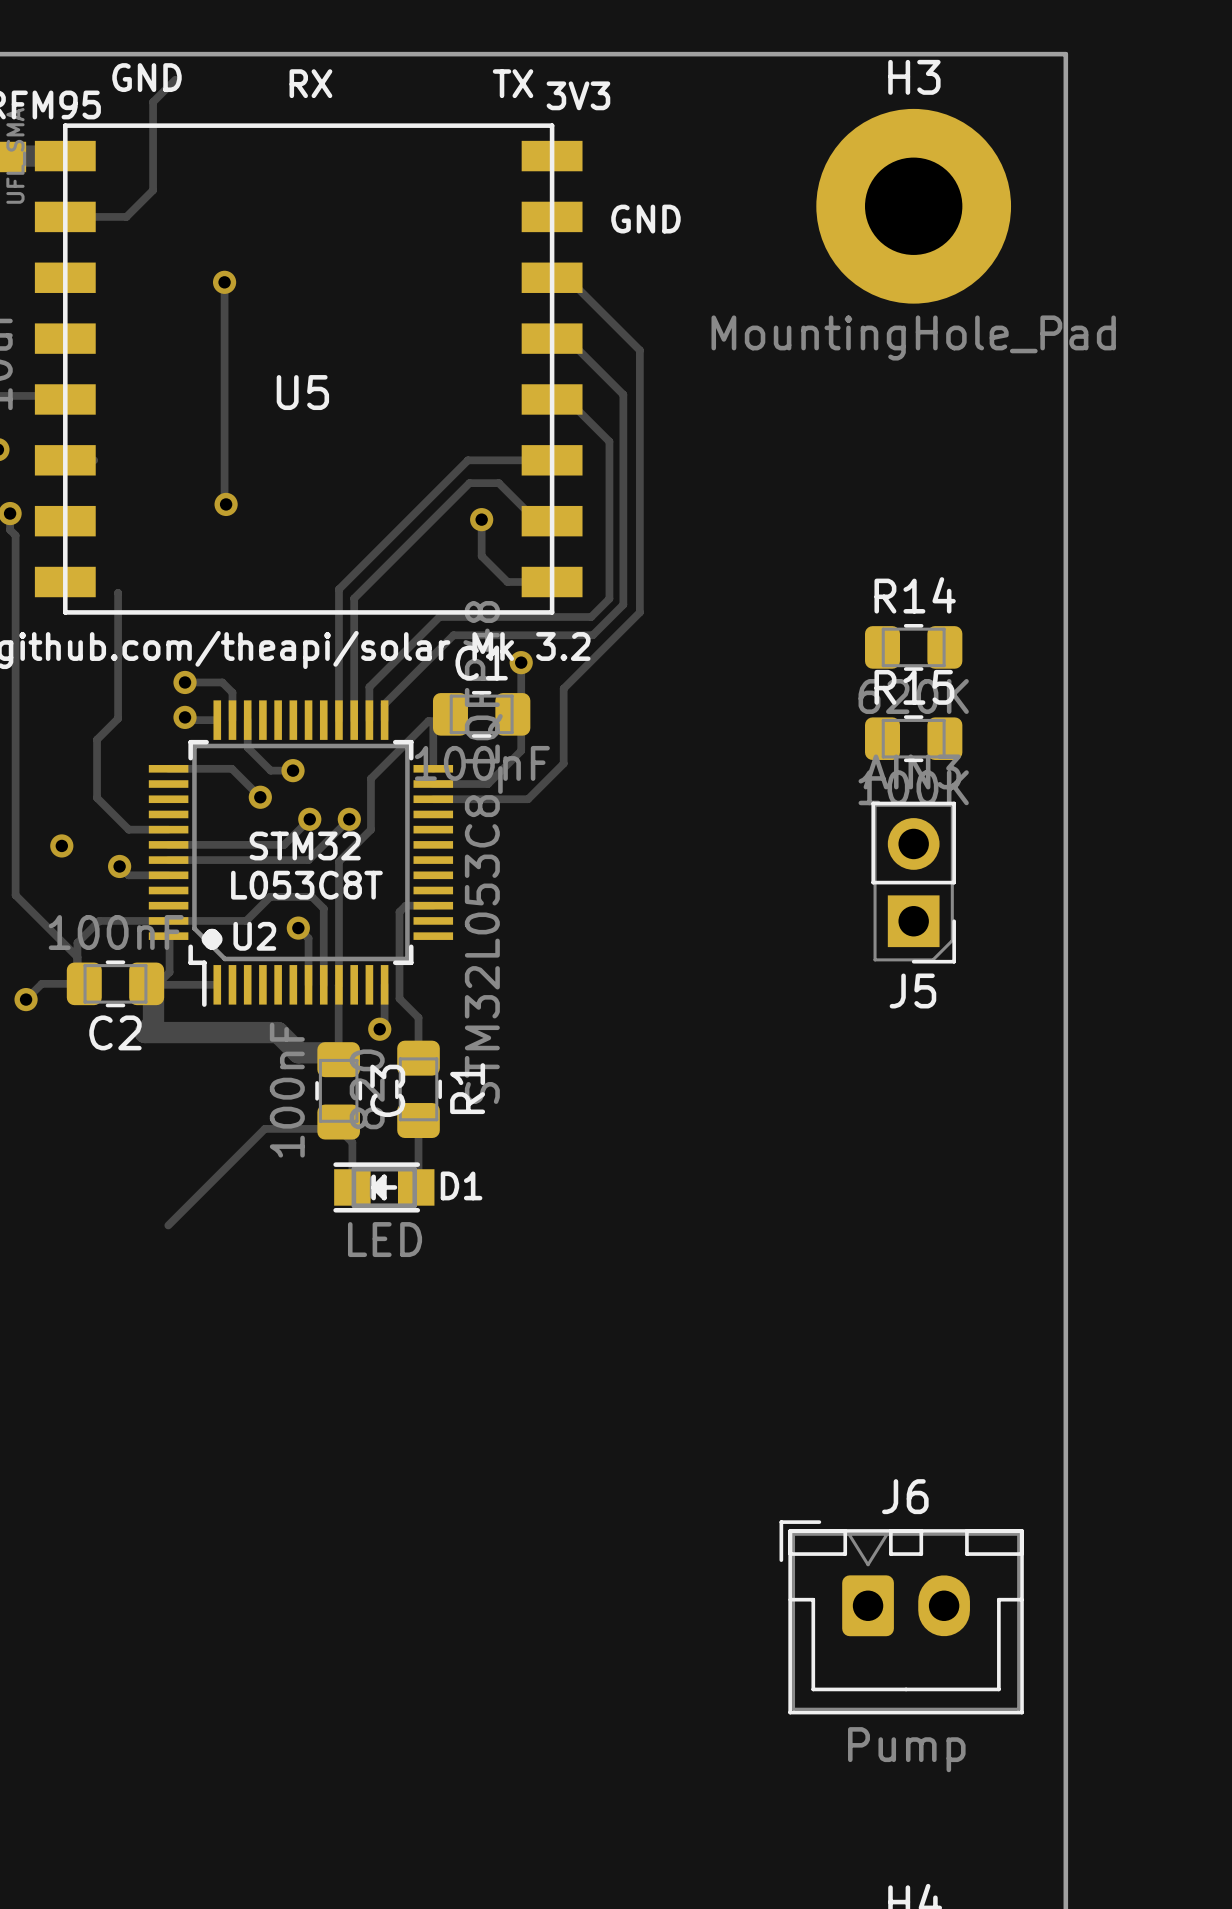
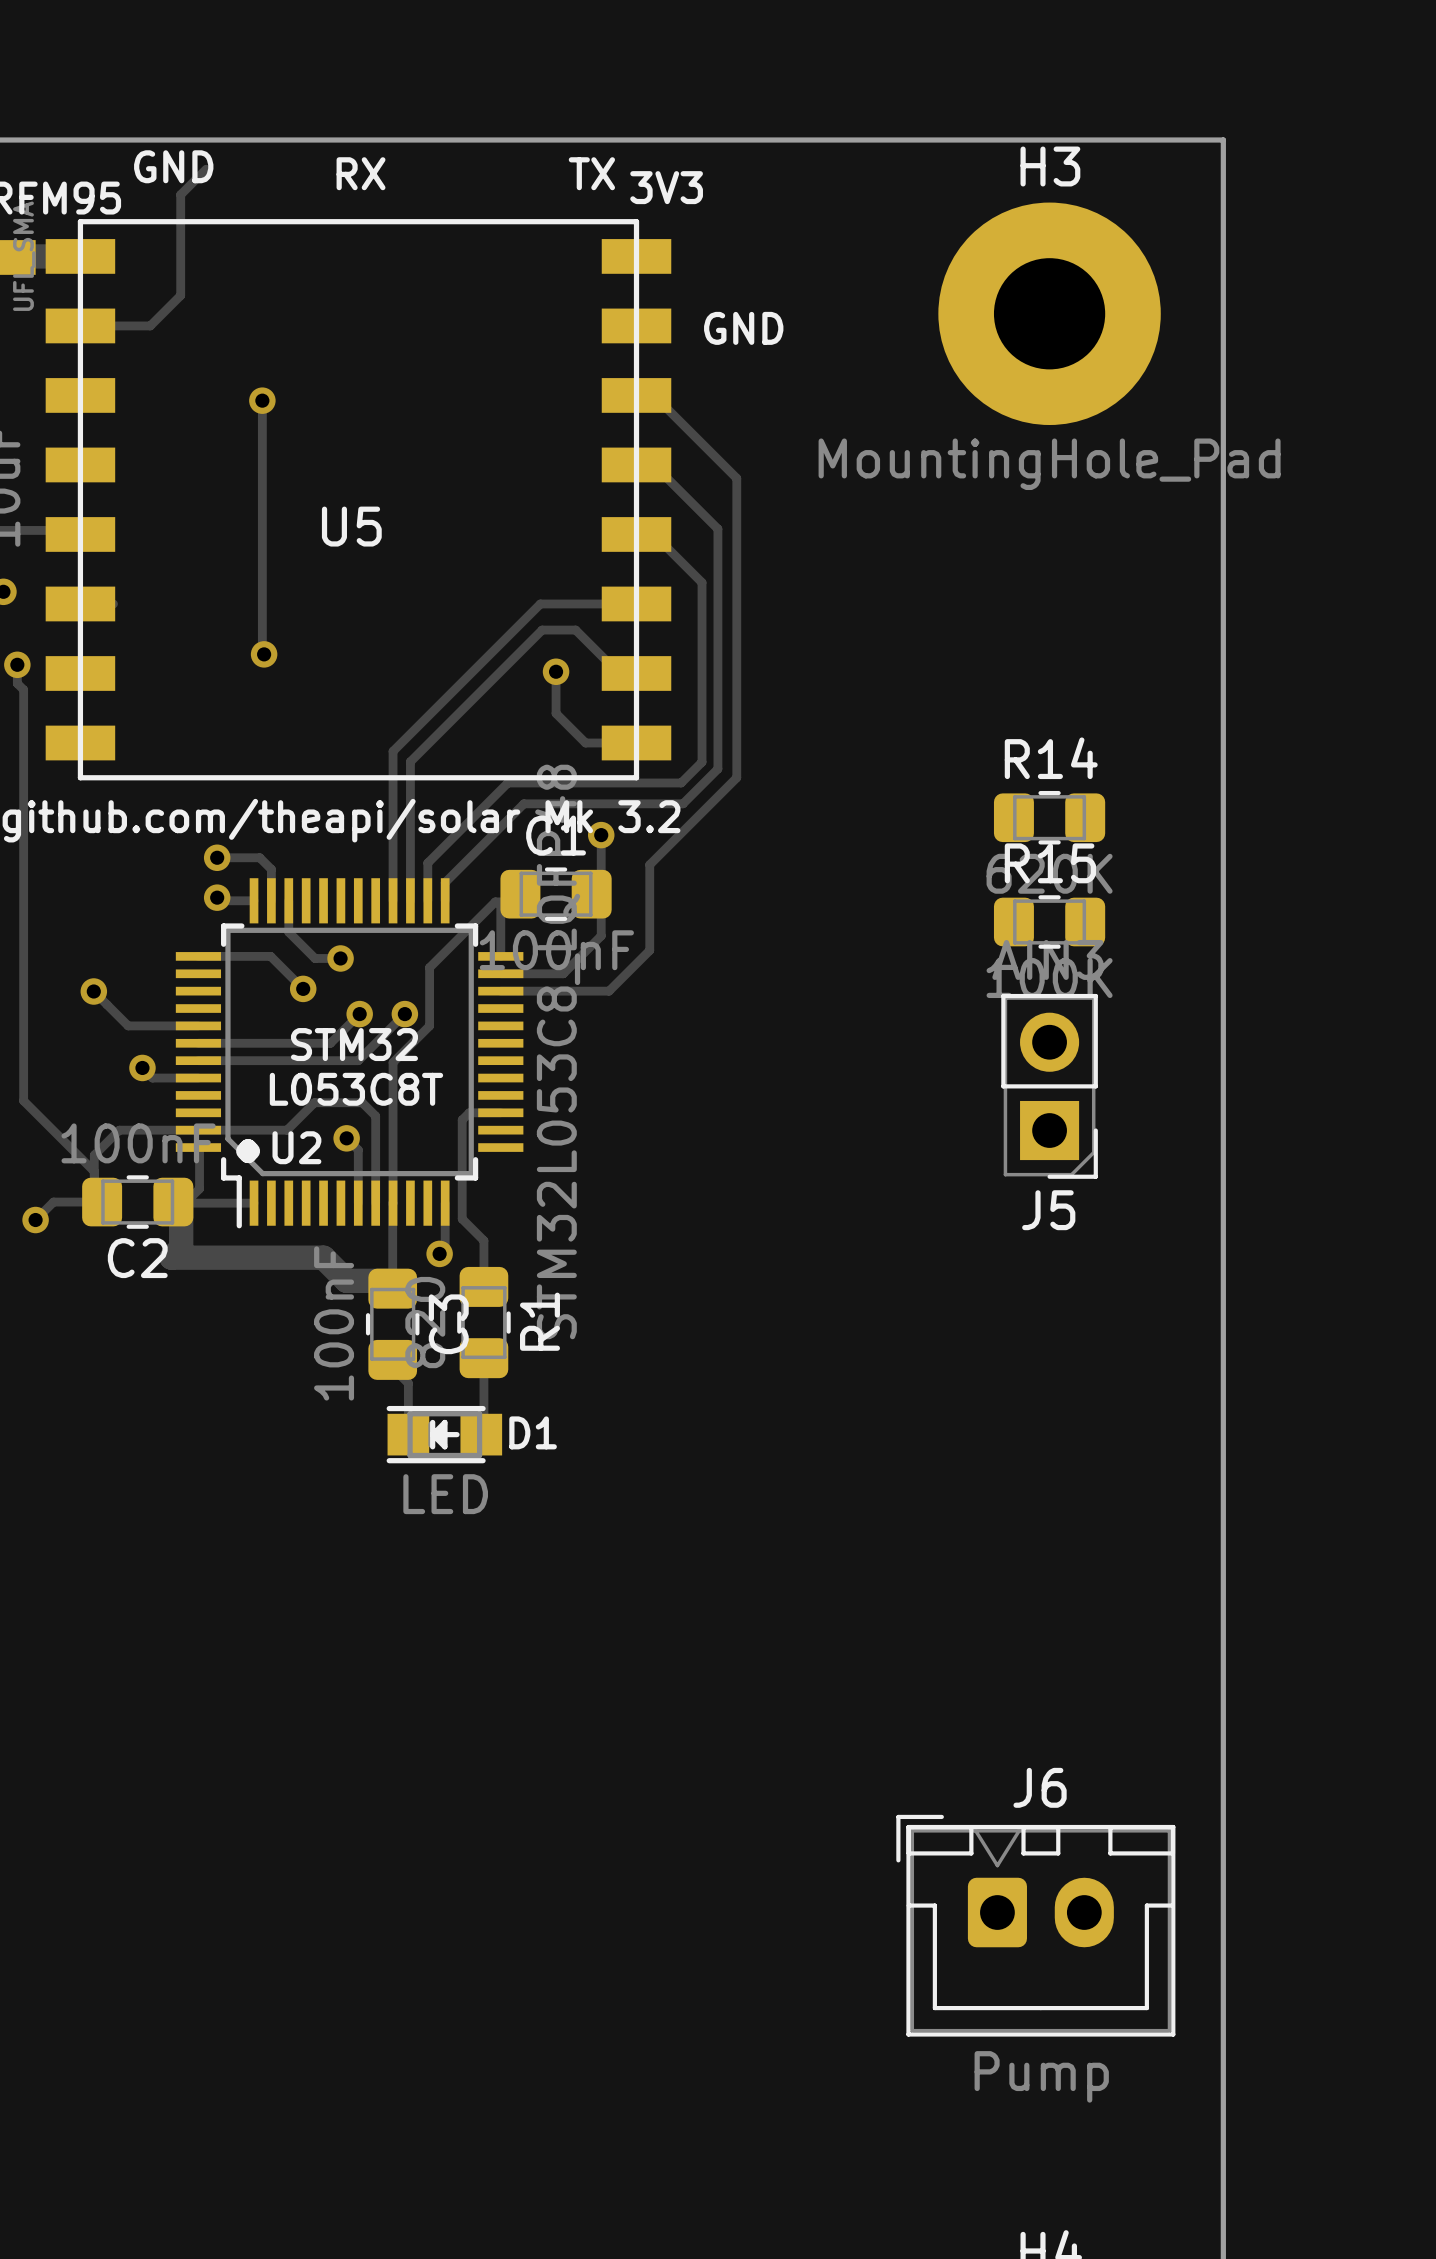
track: (118, 592) (118, 718) (97, 739) (97, 797) (128, 829) -> (93, 991) (128, 1025) (152, 1025)
via position: (61, 845) -> (93, 991)
track: (338, 1128) (264, 1128) (168, 1225) -> none

